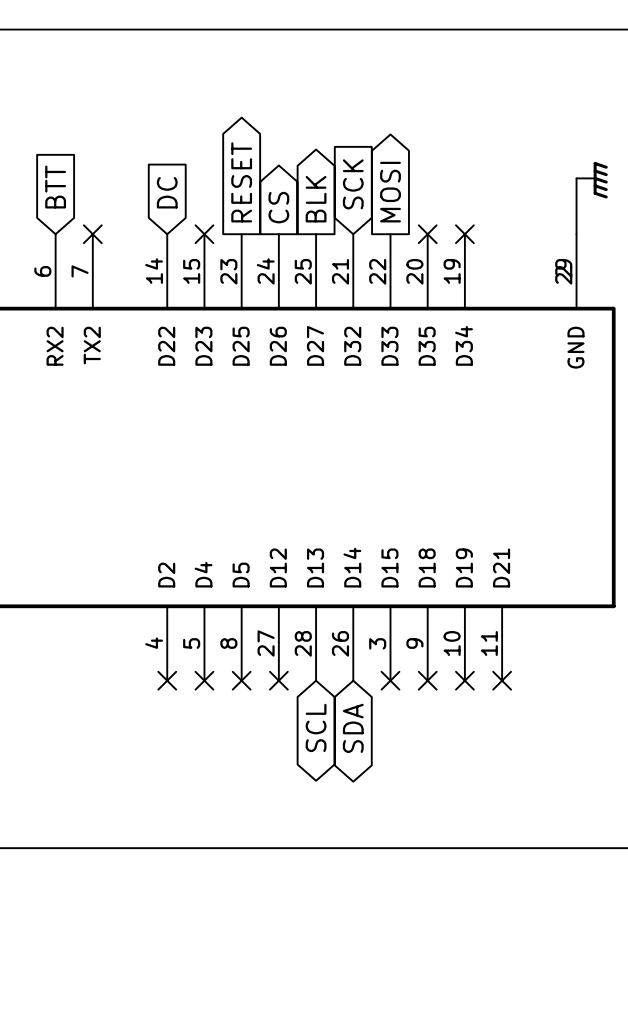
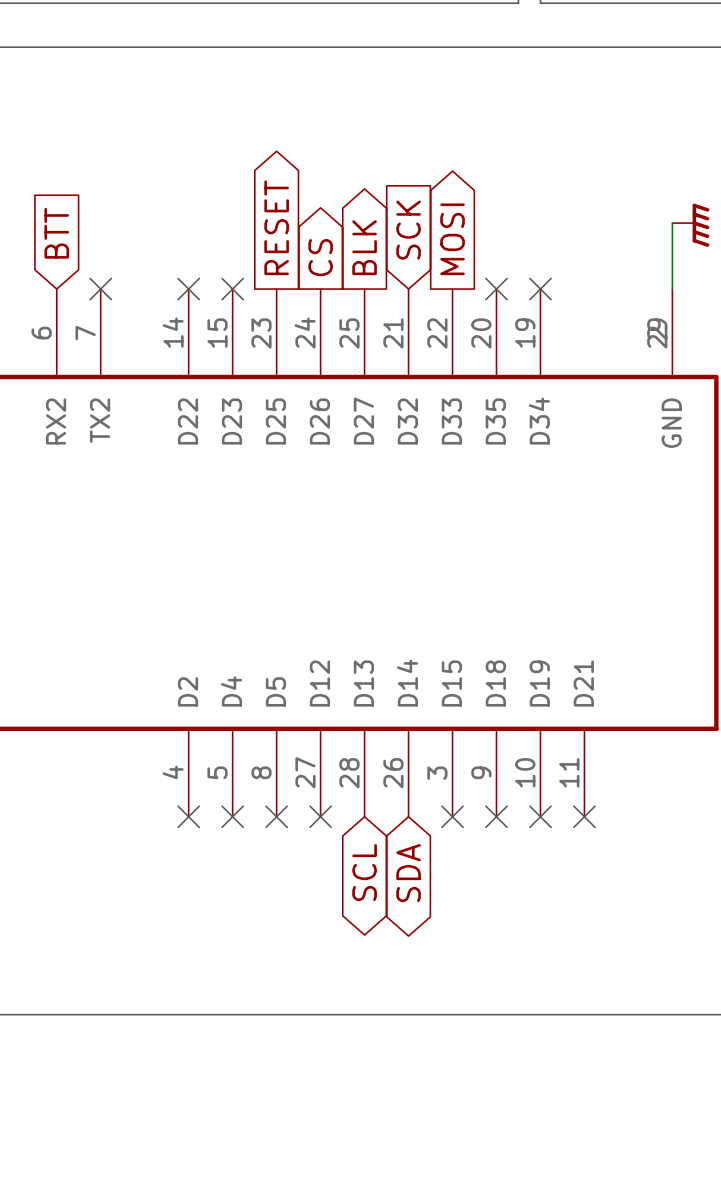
global label: DC (167, 192) -> none
no-connect mark: none -> (188, 289)

